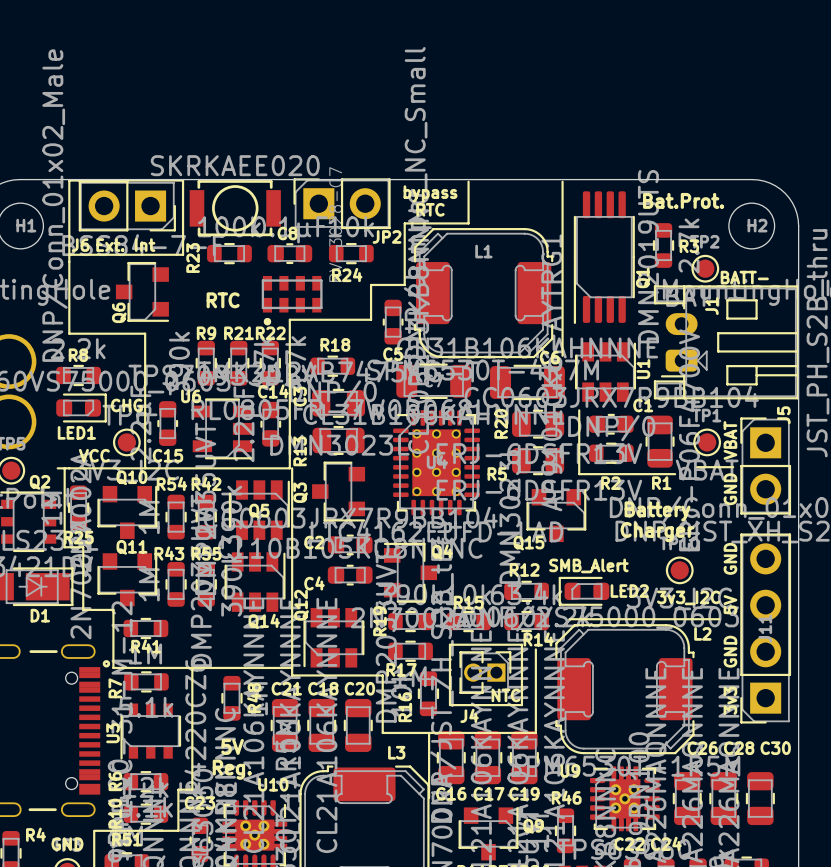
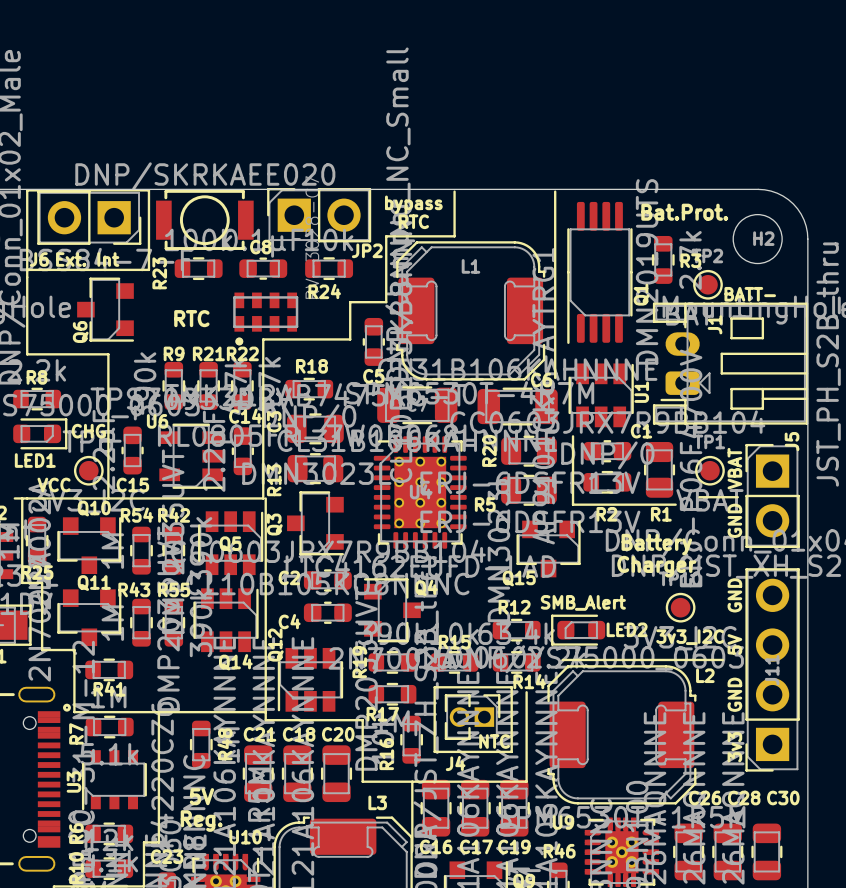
part value: SKRKAEE020 (235, 165) -> DNP/SKRKAEE020 (205, 176)

